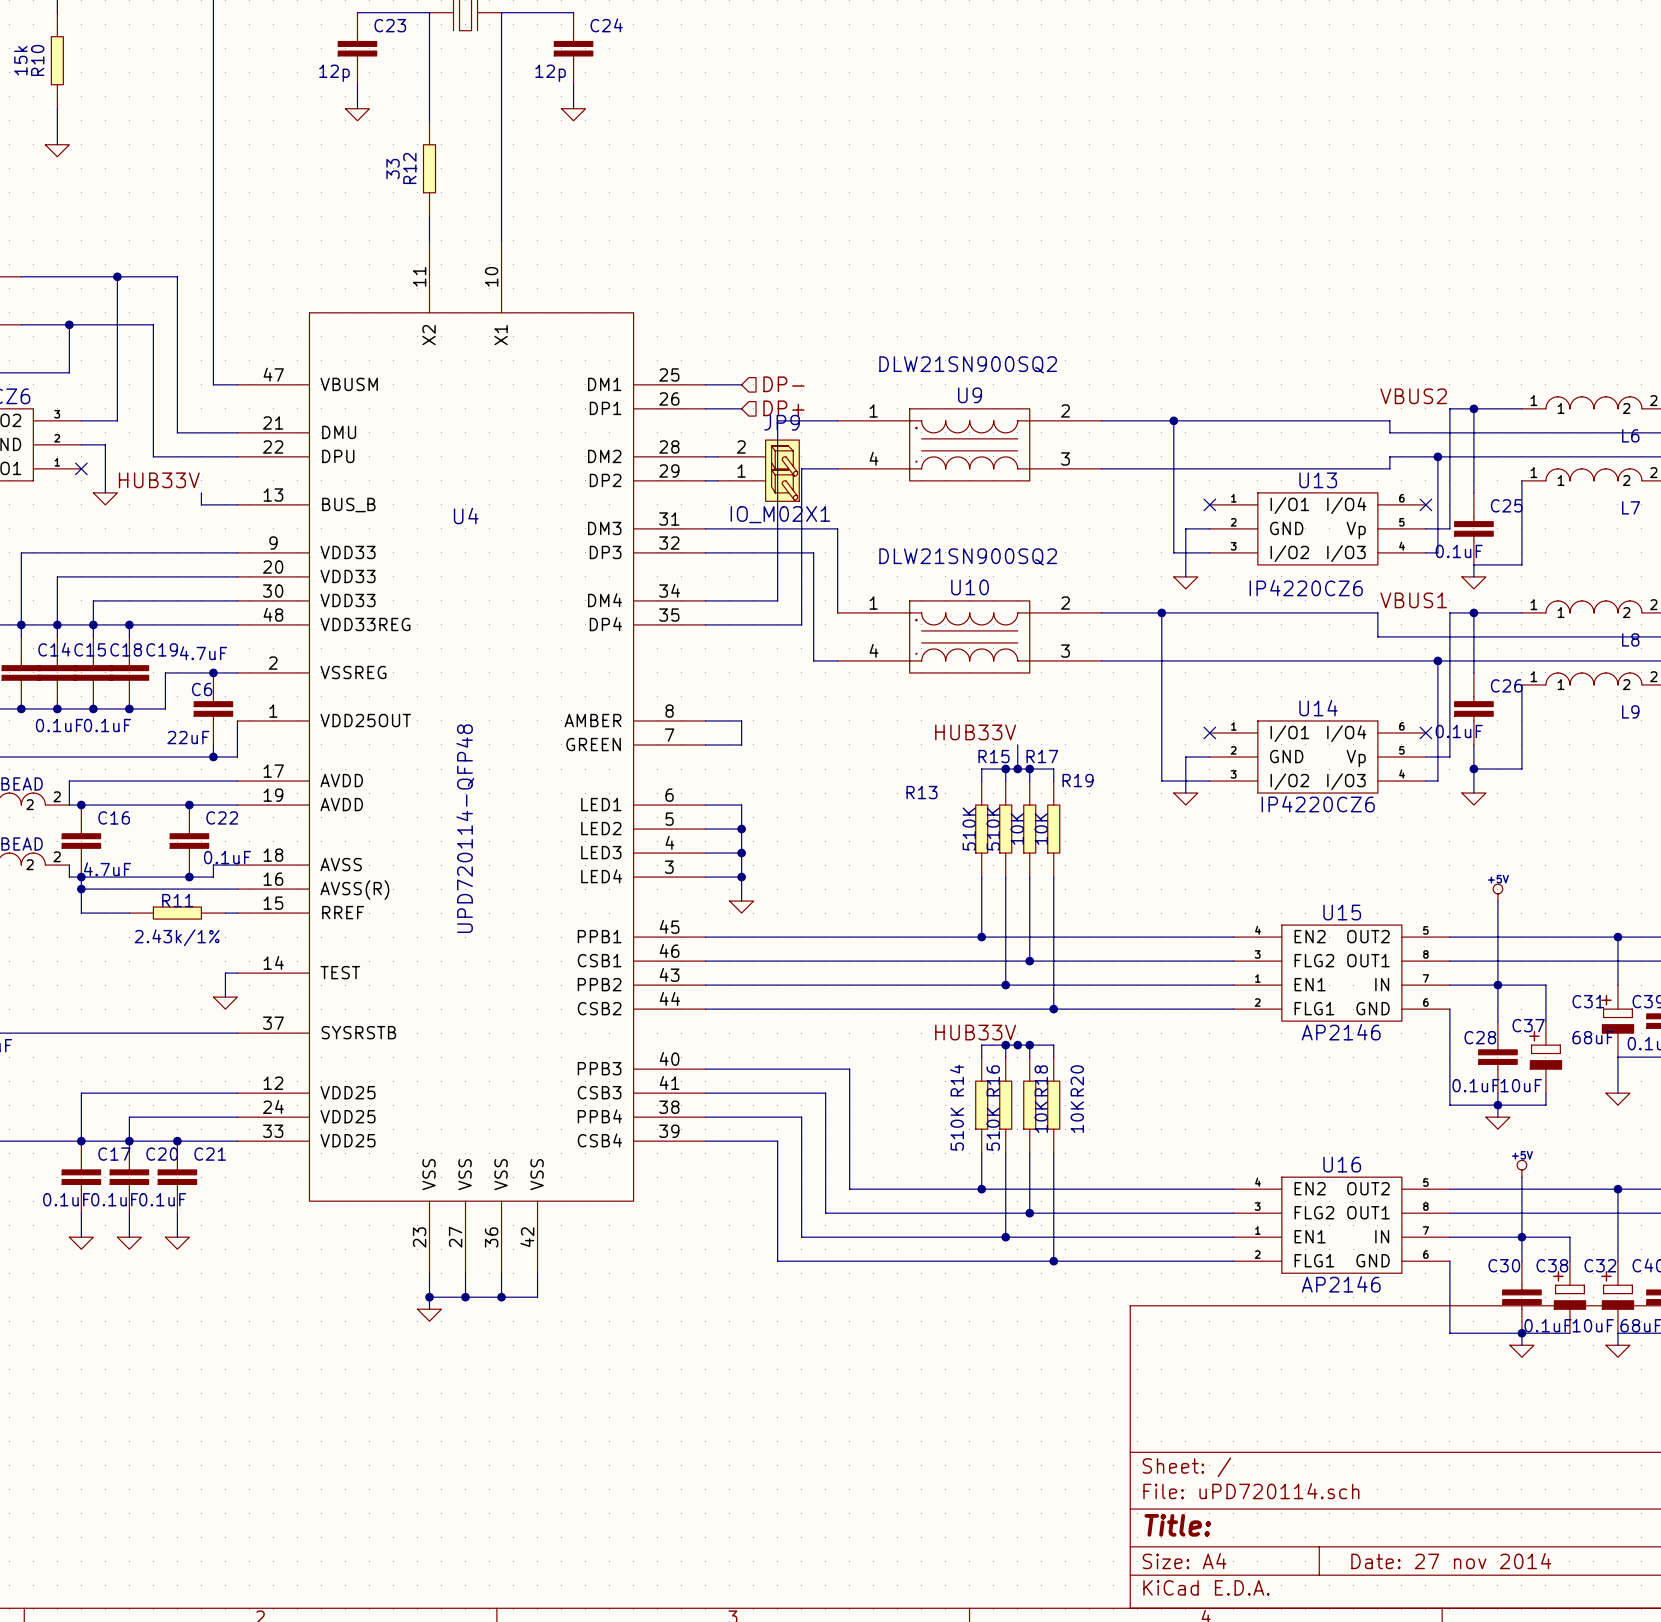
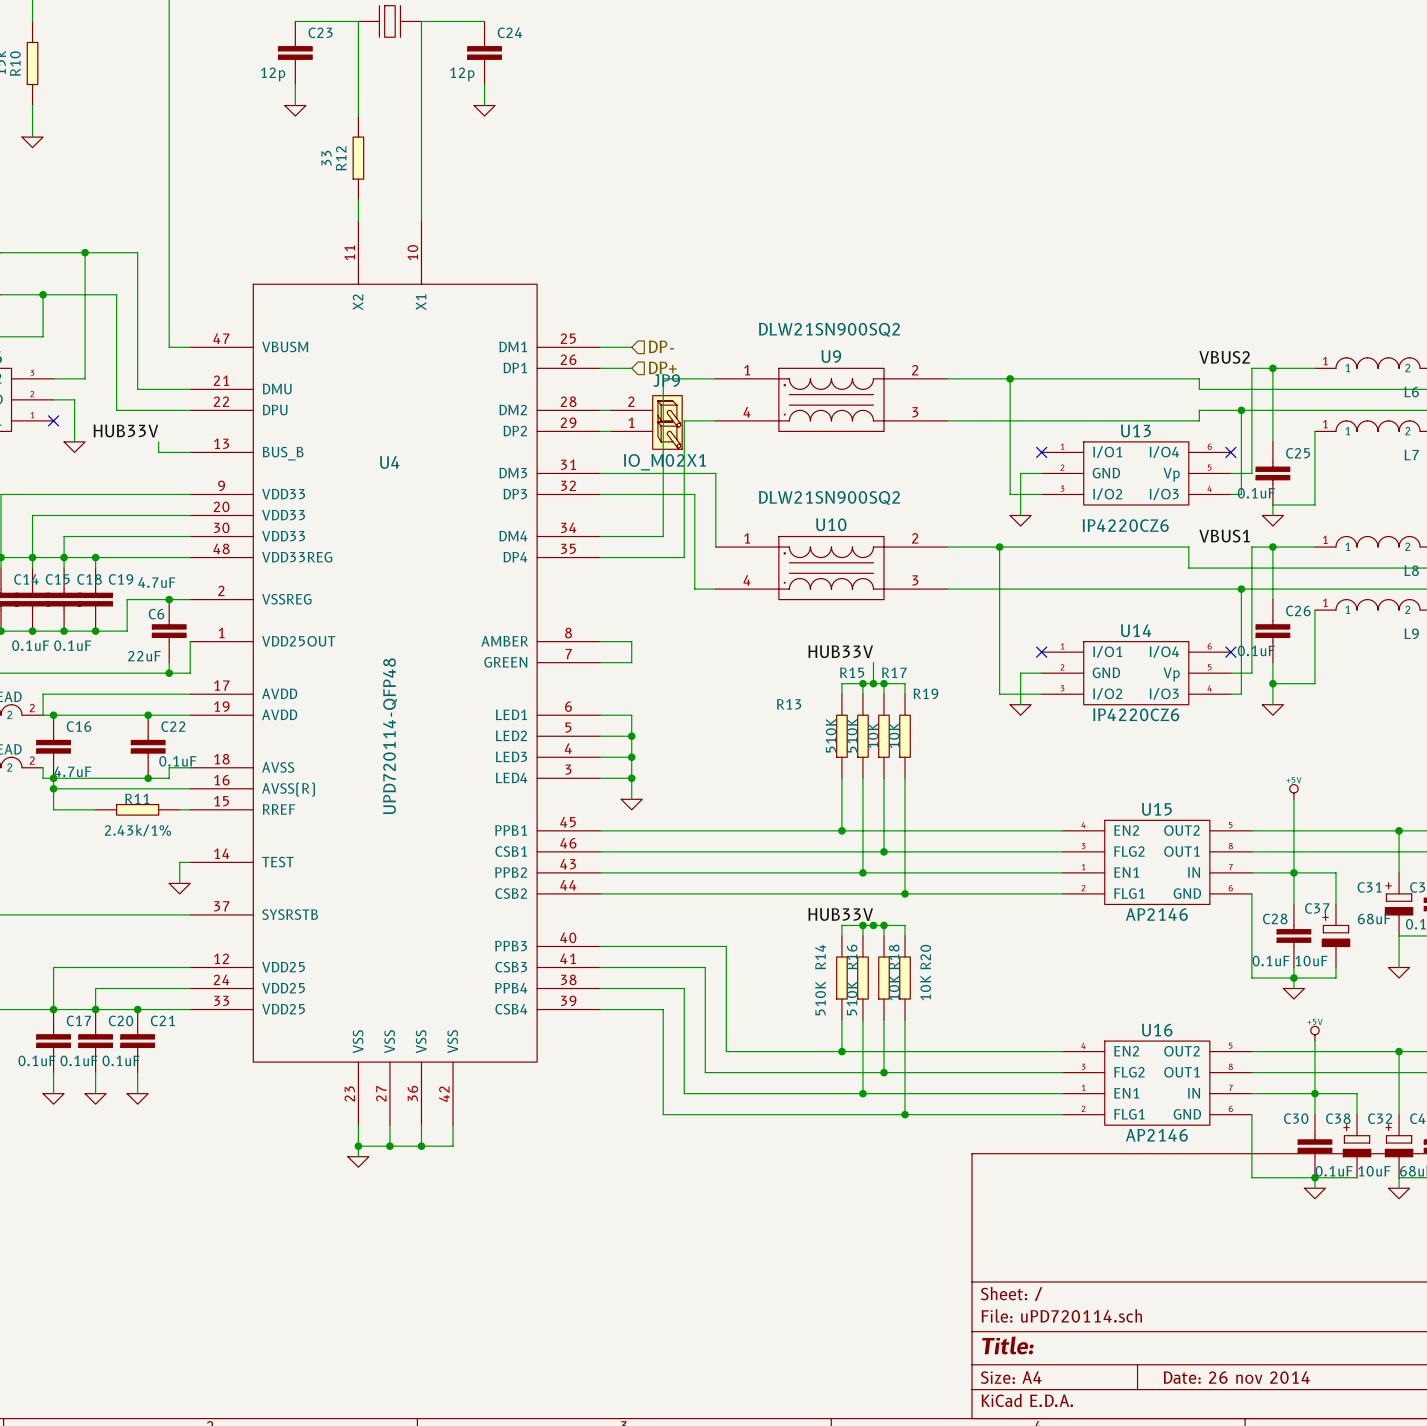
title block: Date: 27 nov 2014 (1451, 1561) -> Date: 26 nov 2014 (1236, 1377)

